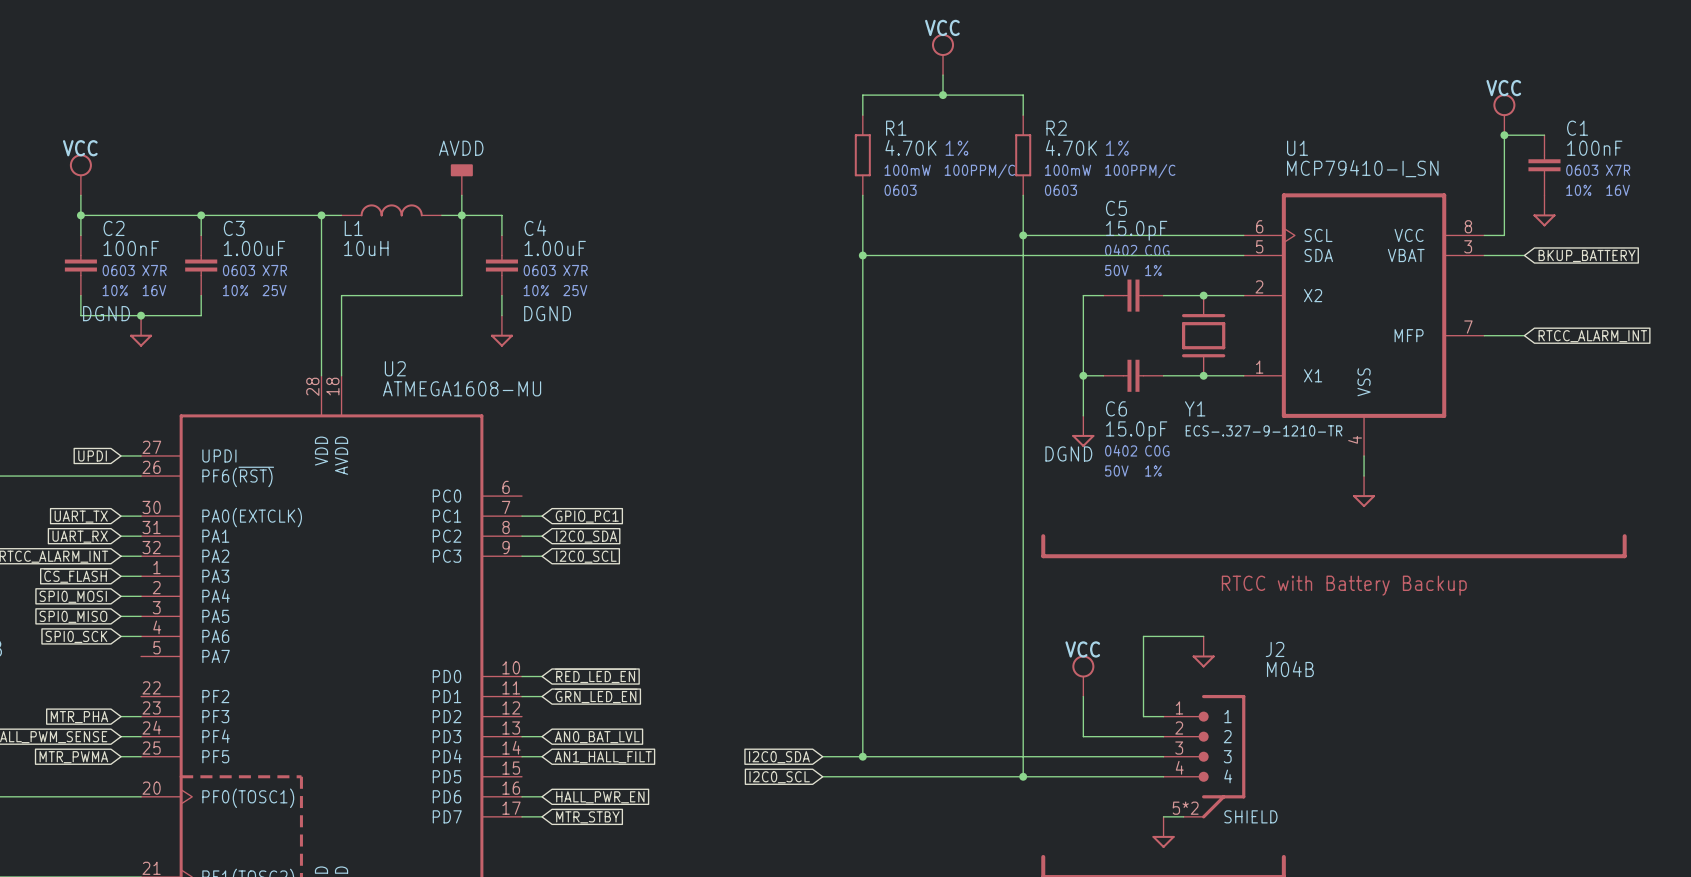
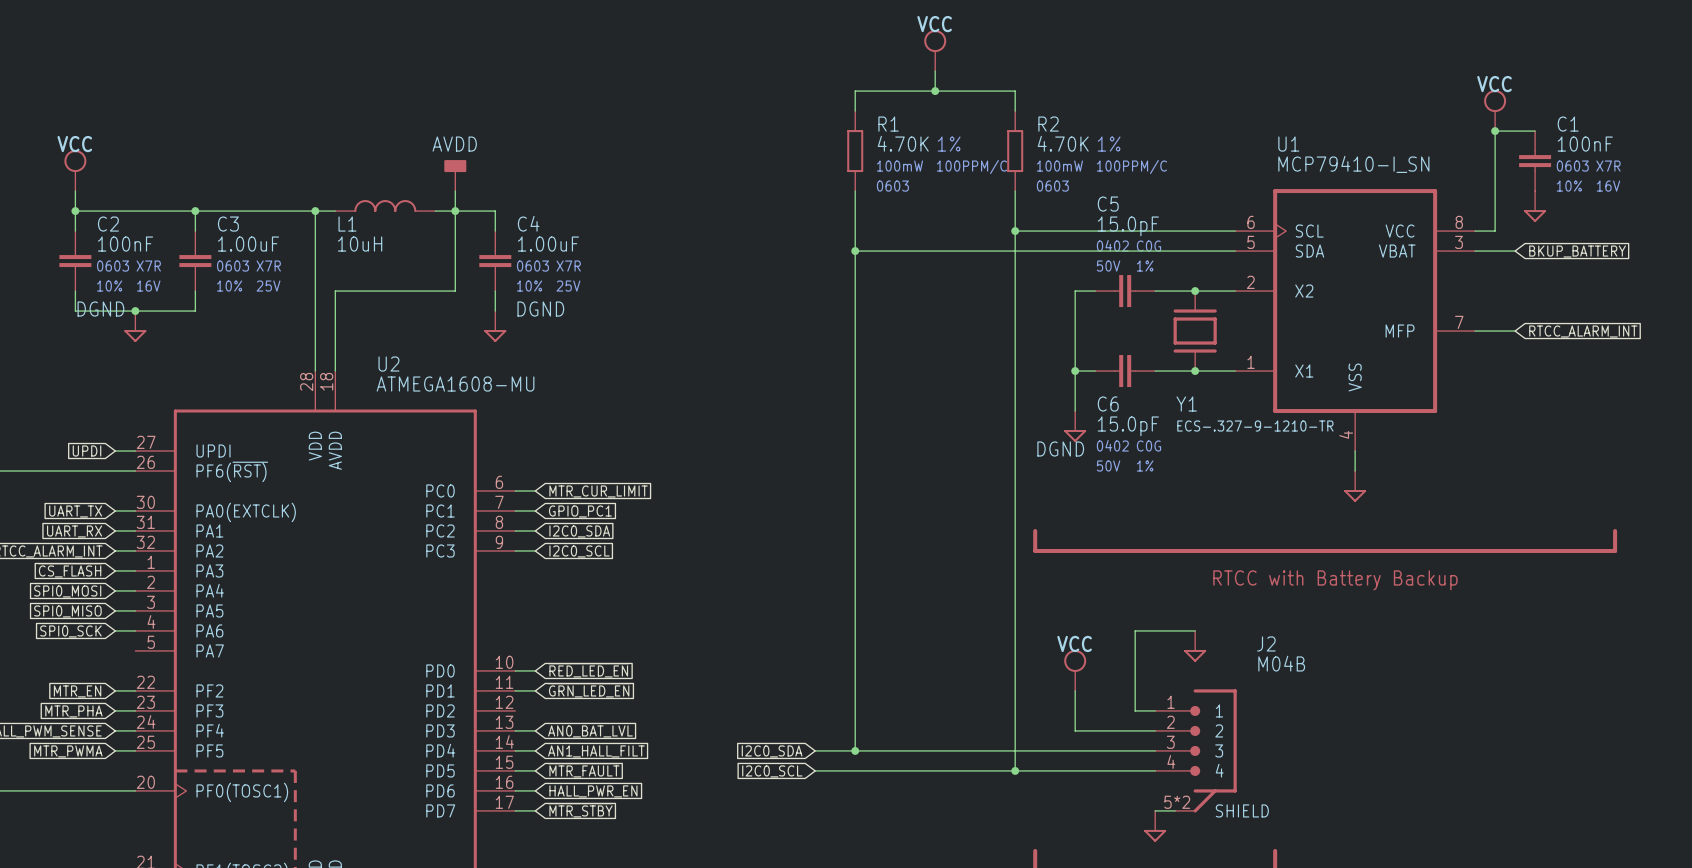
wire: none -> (515, 491) (535, 491)
global label: none -> MTR_CUR_LIMIT (598, 491)
wire: none -> (115, 690) (135, 690)
global label: none -> MTR_EN (77, 691)
wire: none -> (515, 770) (535, 770)
global label: none -> ~{MTR_FAULT} (583, 770)

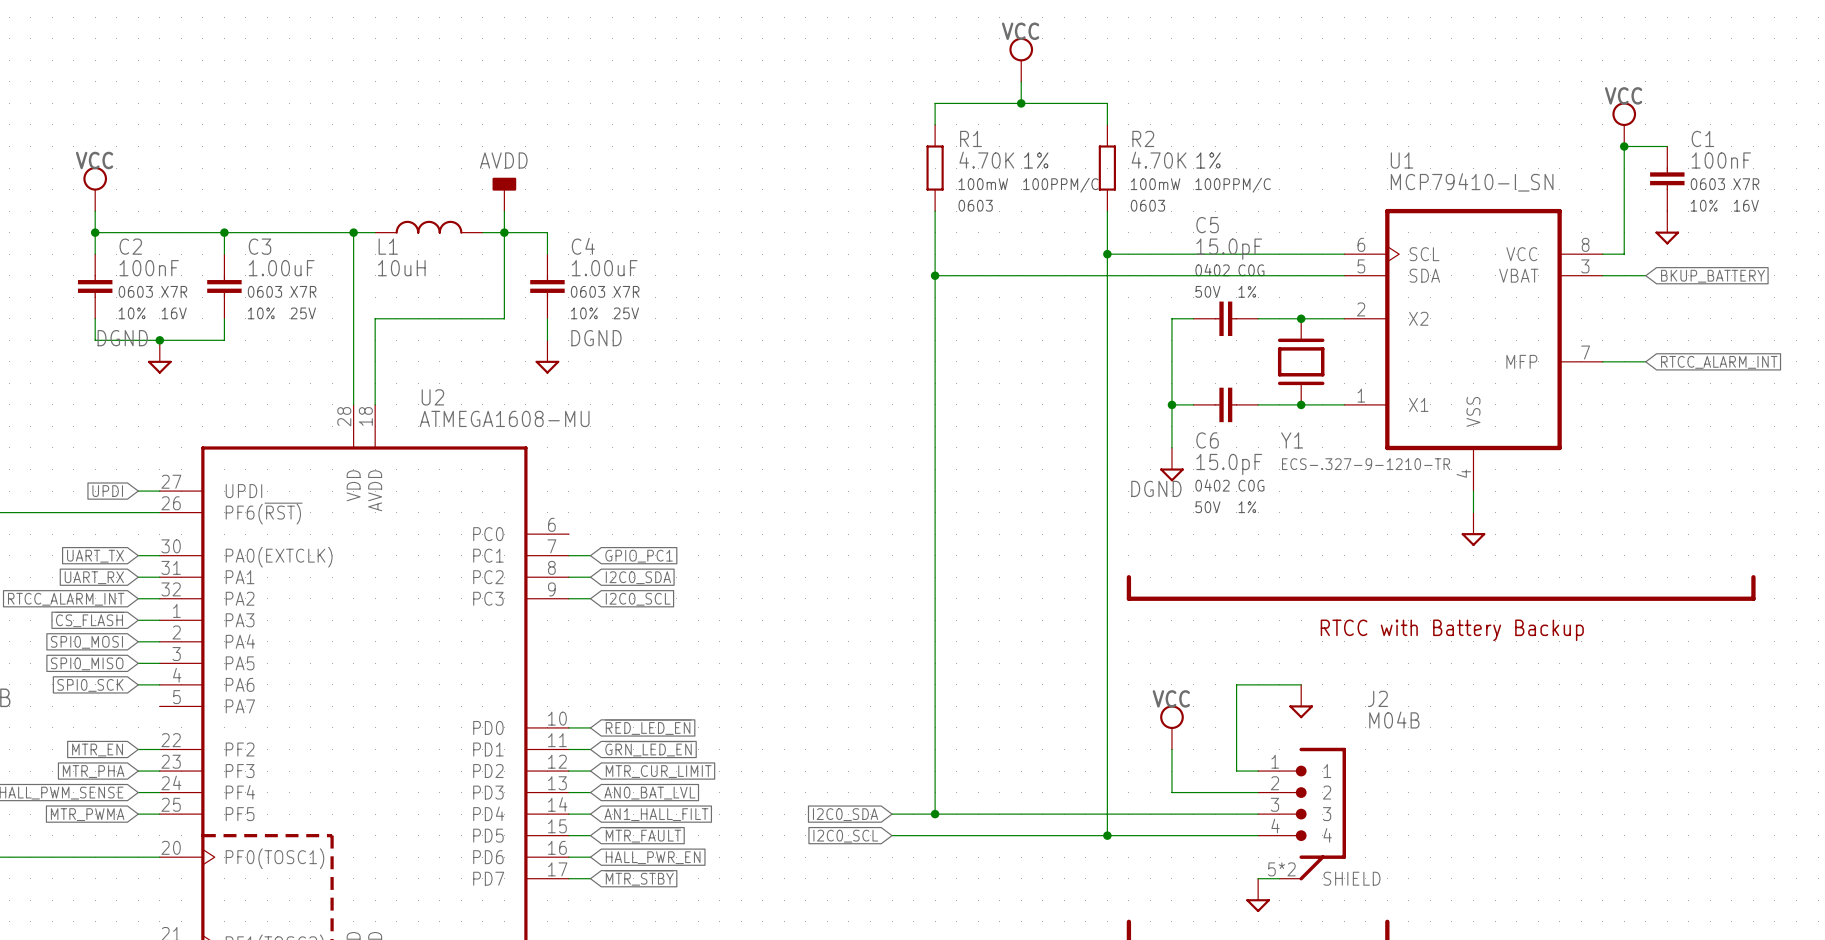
wire: (515, 491) (535, 491) -> none
global label: MTR_CUR_LIMIT (598, 491) -> none
wire: none -> (568, 771) (590, 771)
global label: none -> MTR_CUR_LIMIT (658, 771)

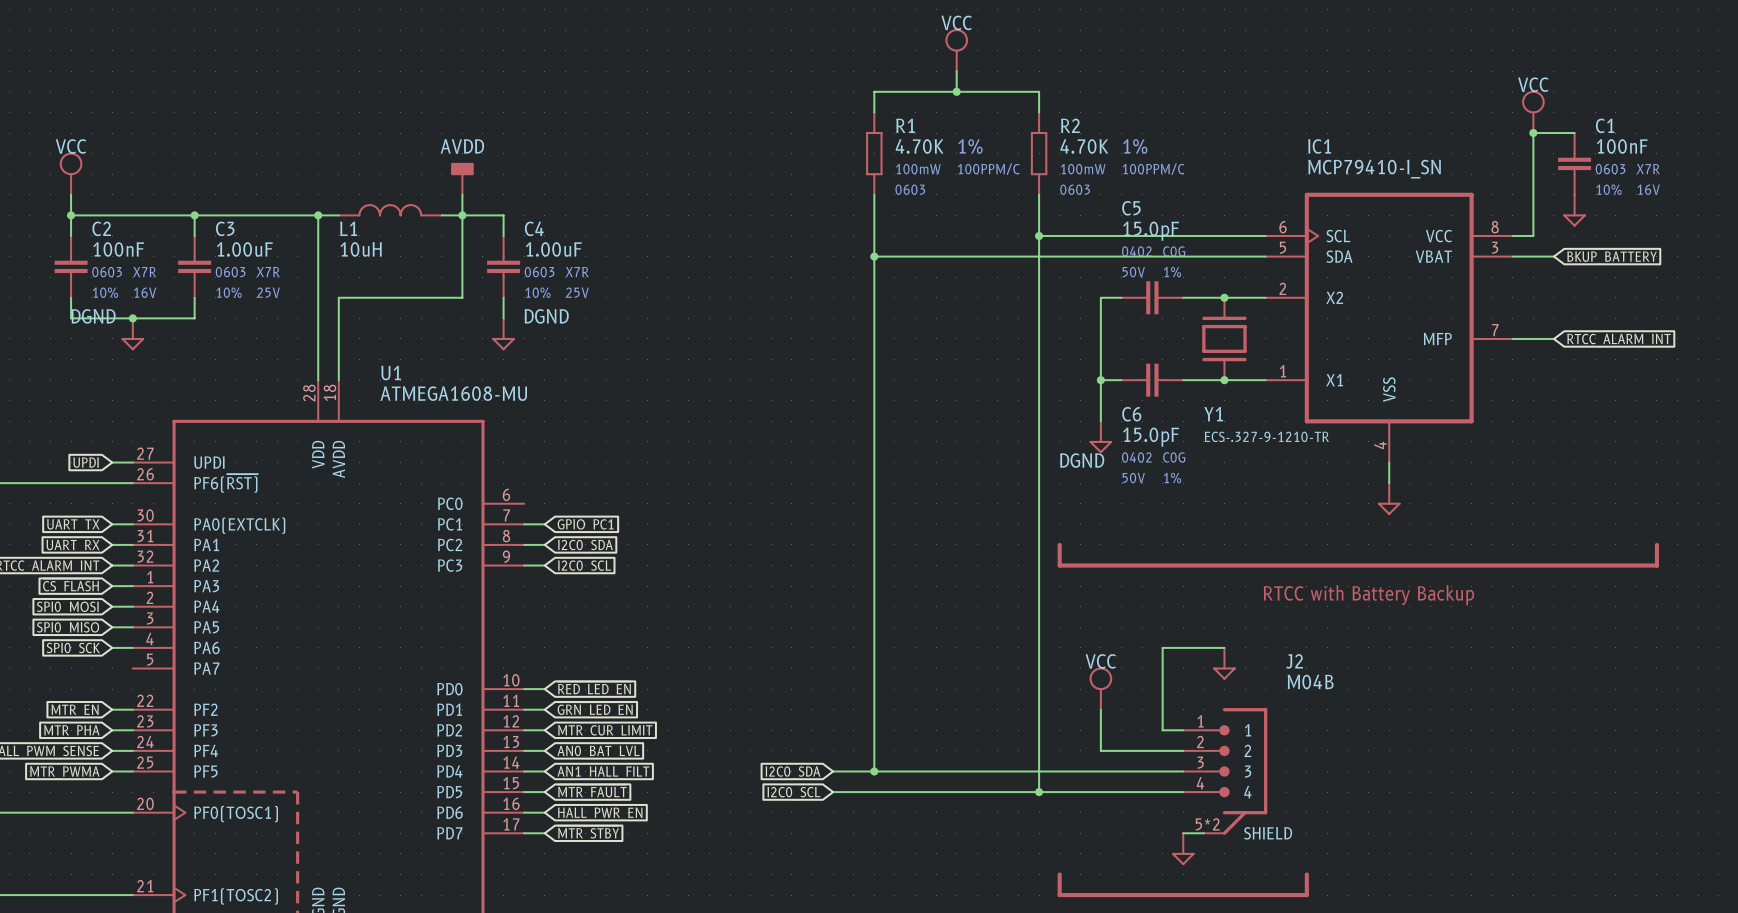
U1 name: U1 (1402, 160) -> IC1 (1319, 146)
U2 name: U2 (432, 397) -> U1 (391, 373)

